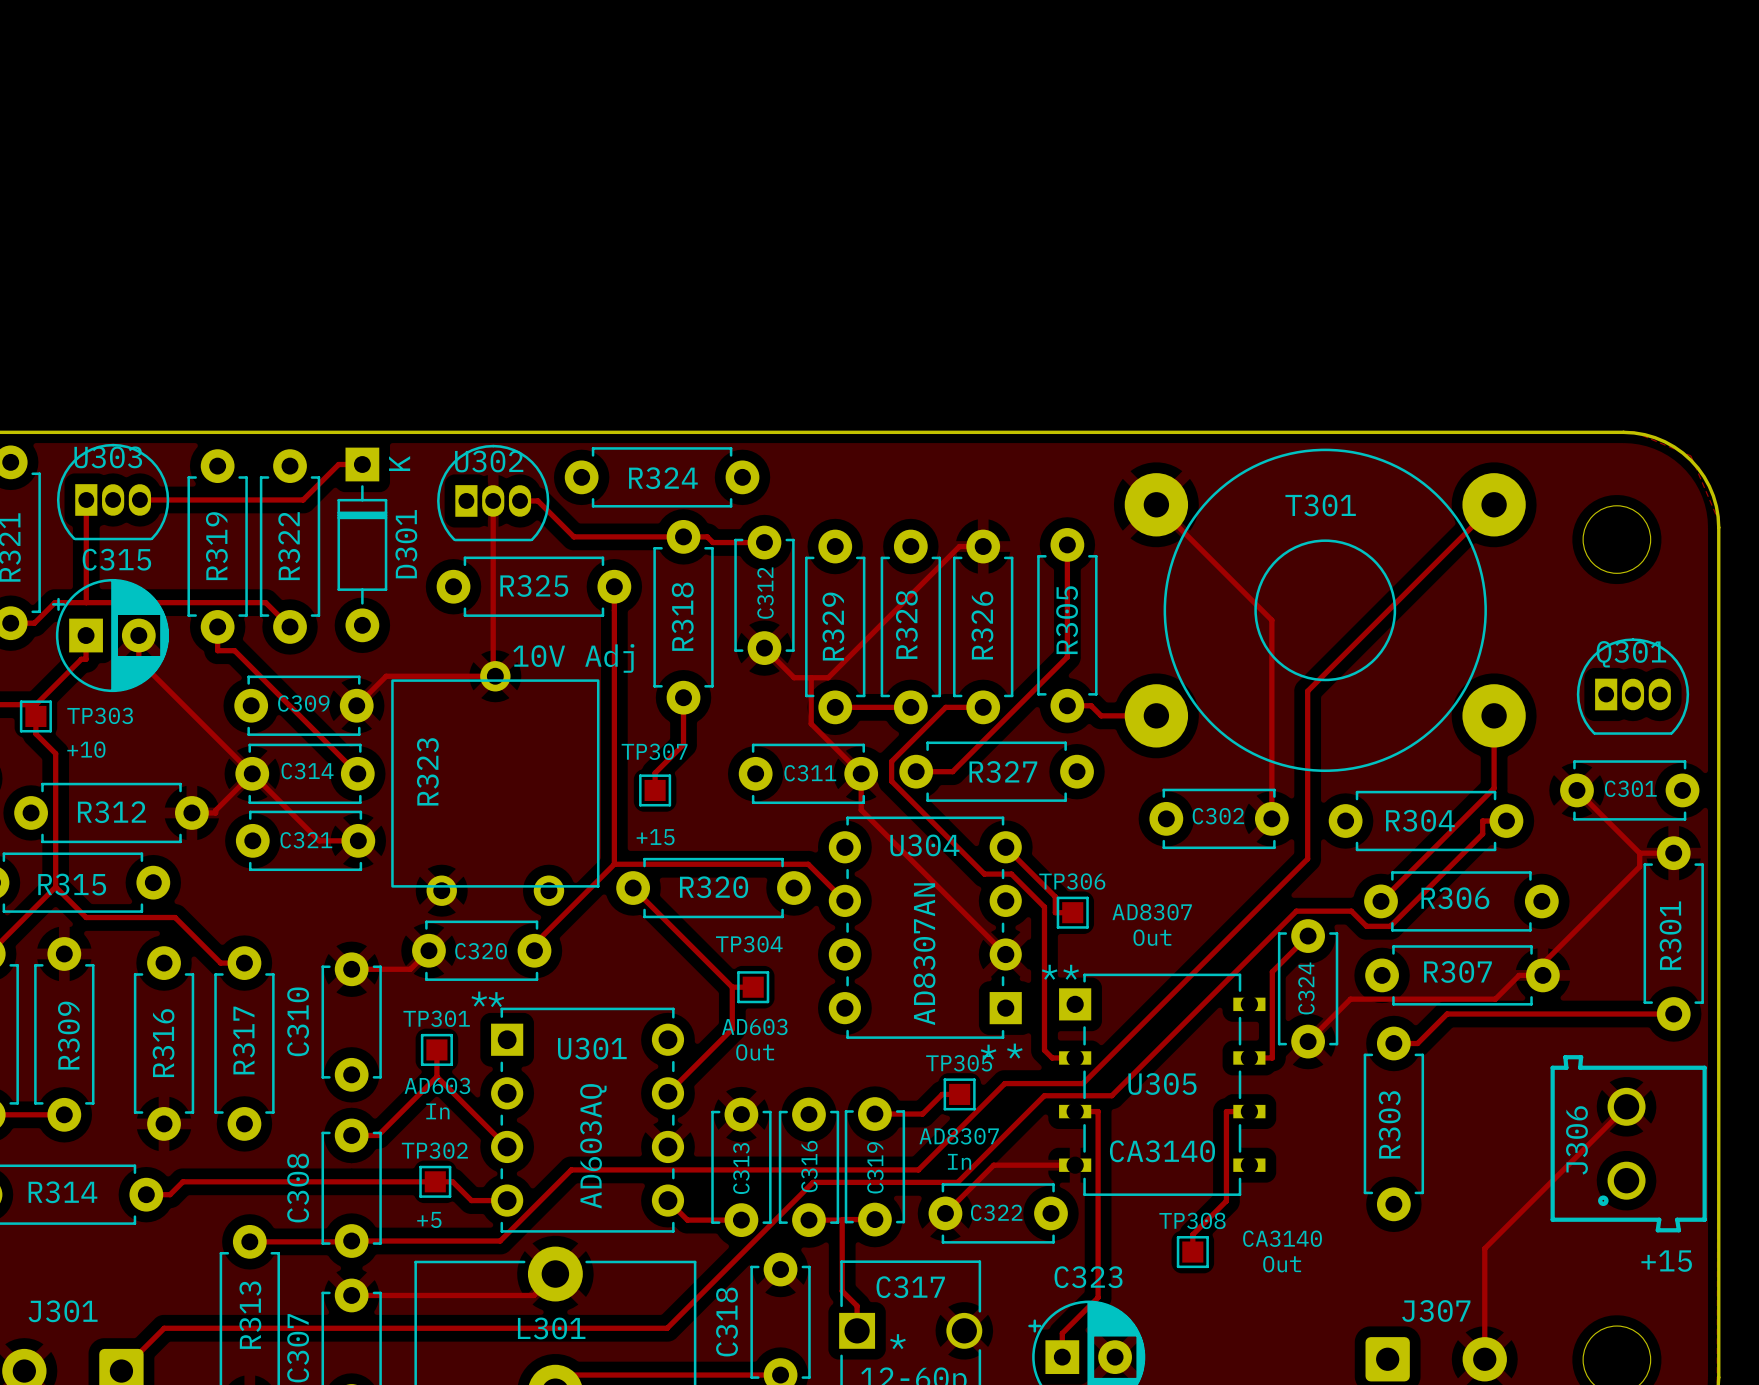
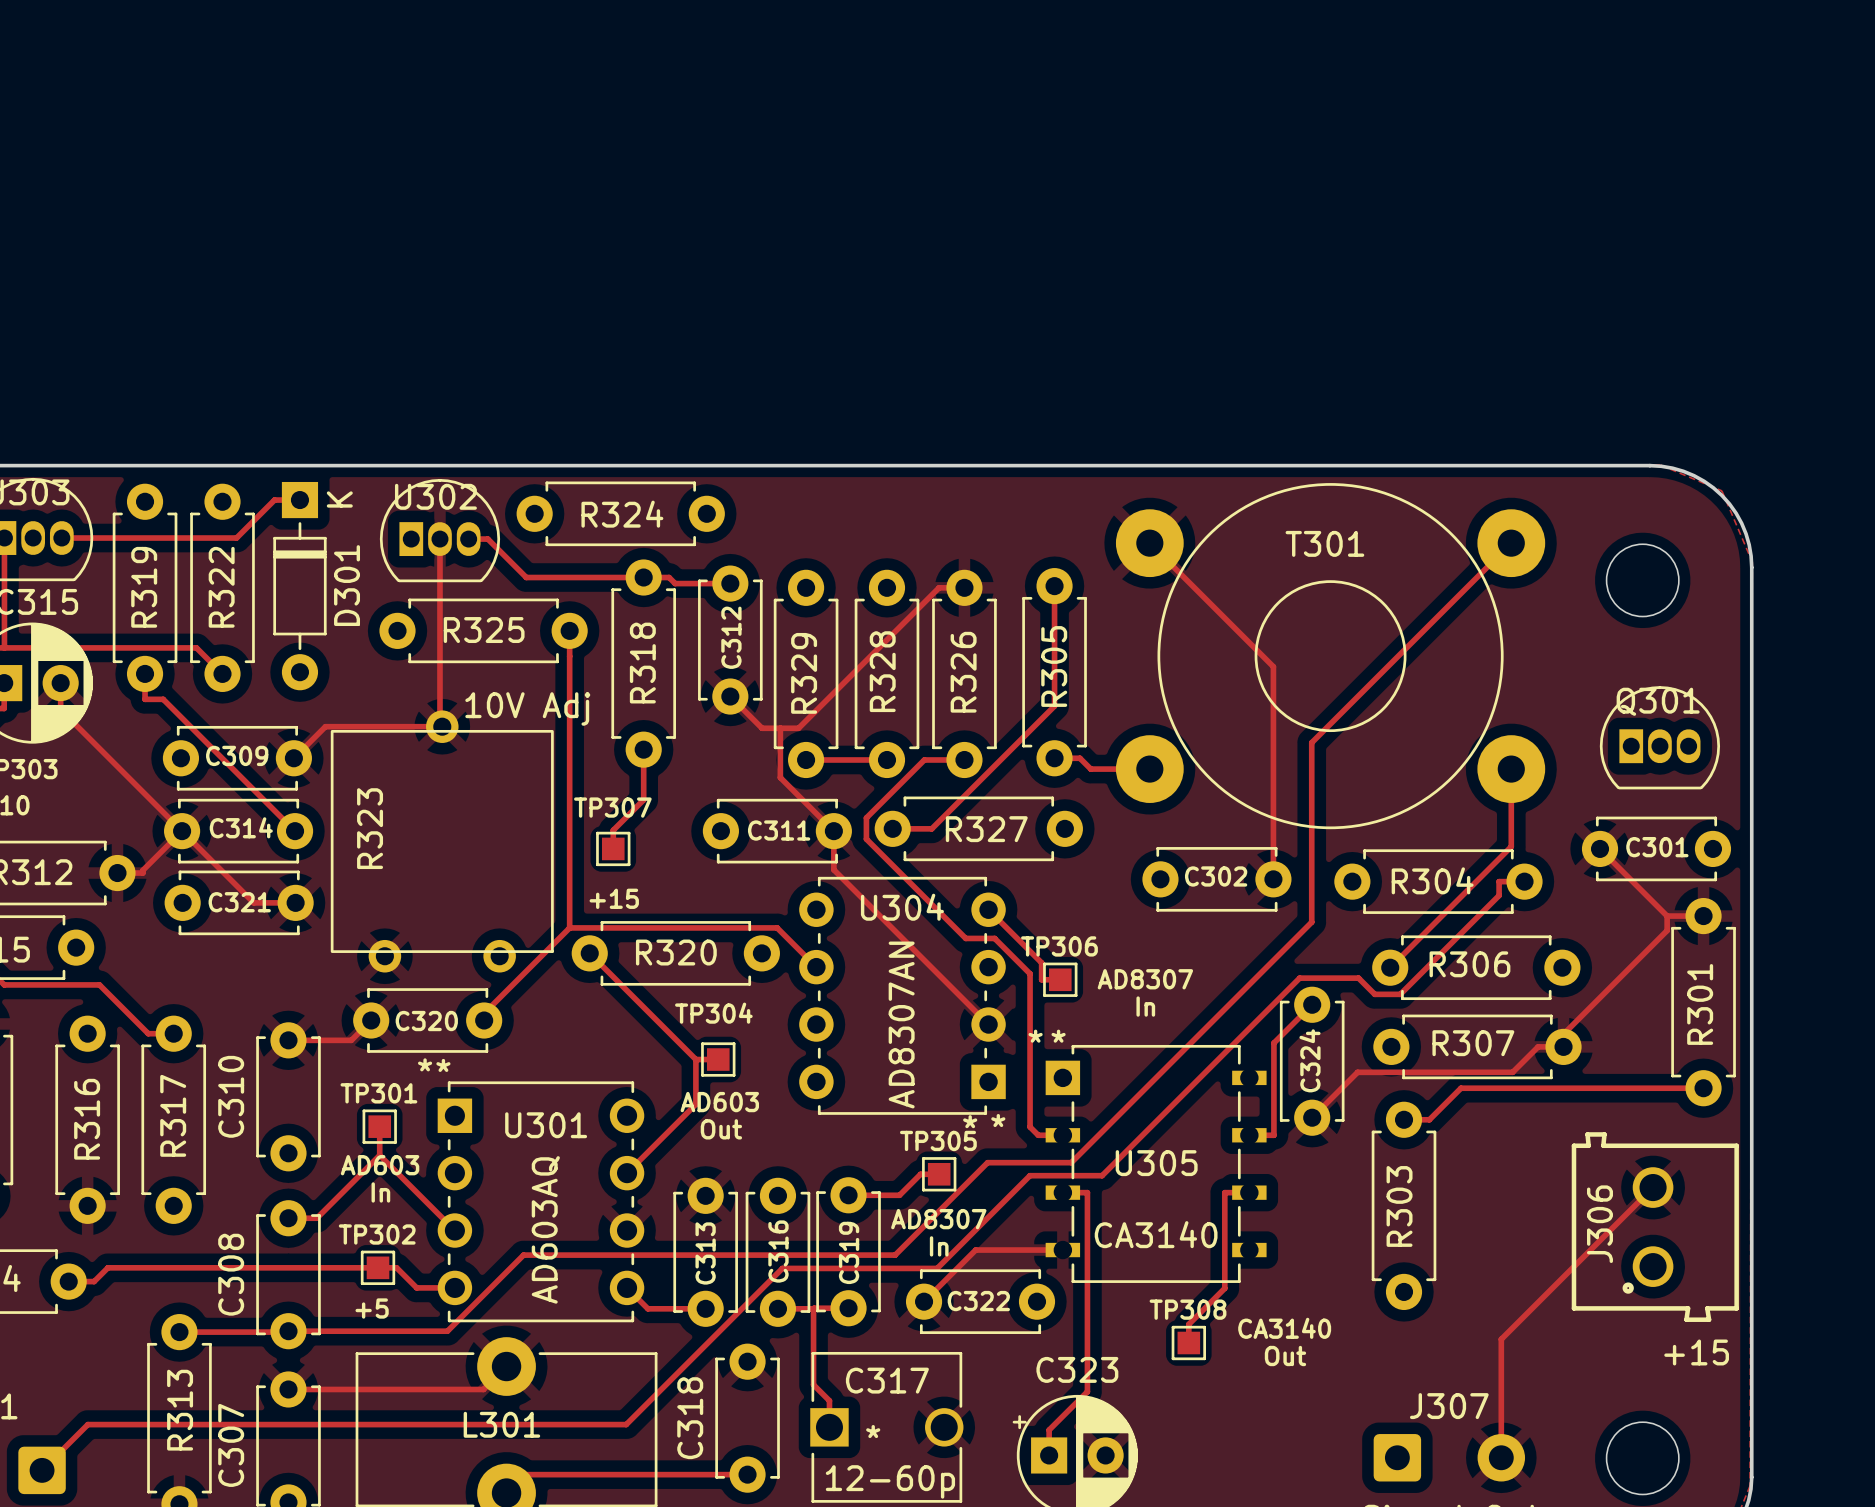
text: Out (1152, 937) -> In (1145, 1006)

